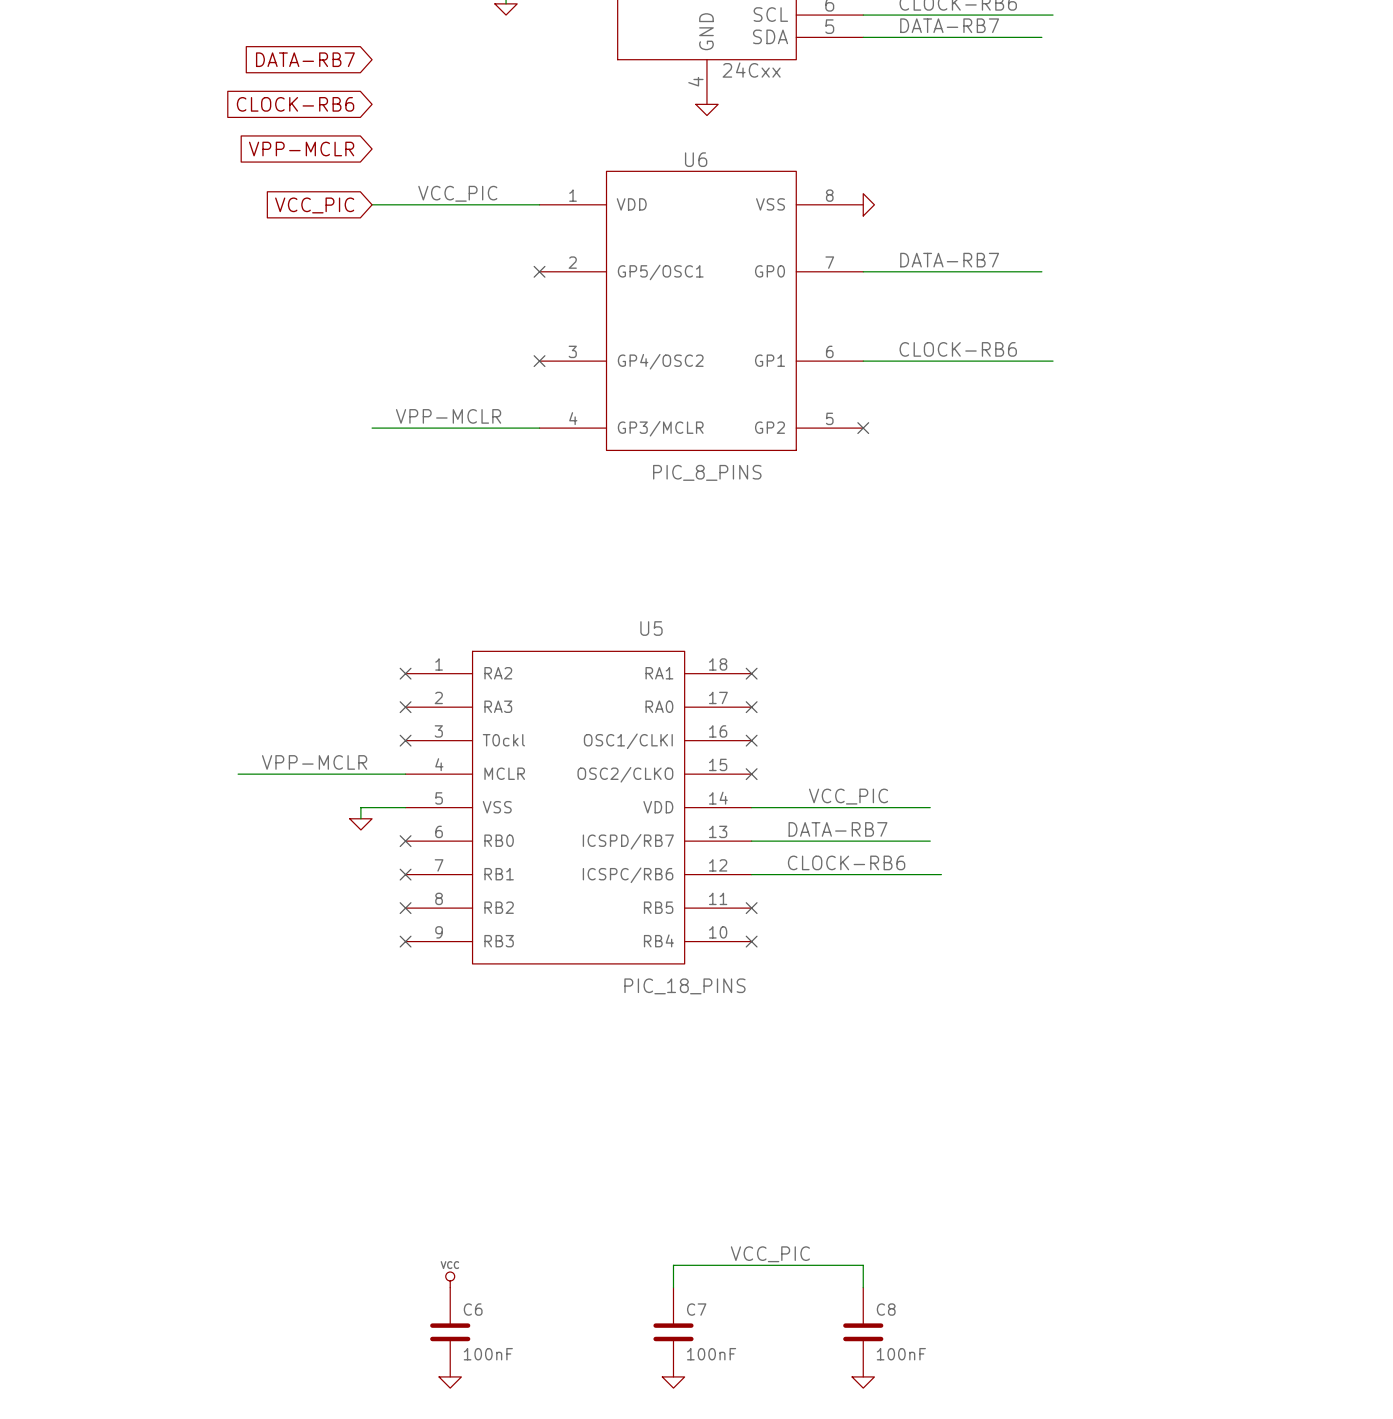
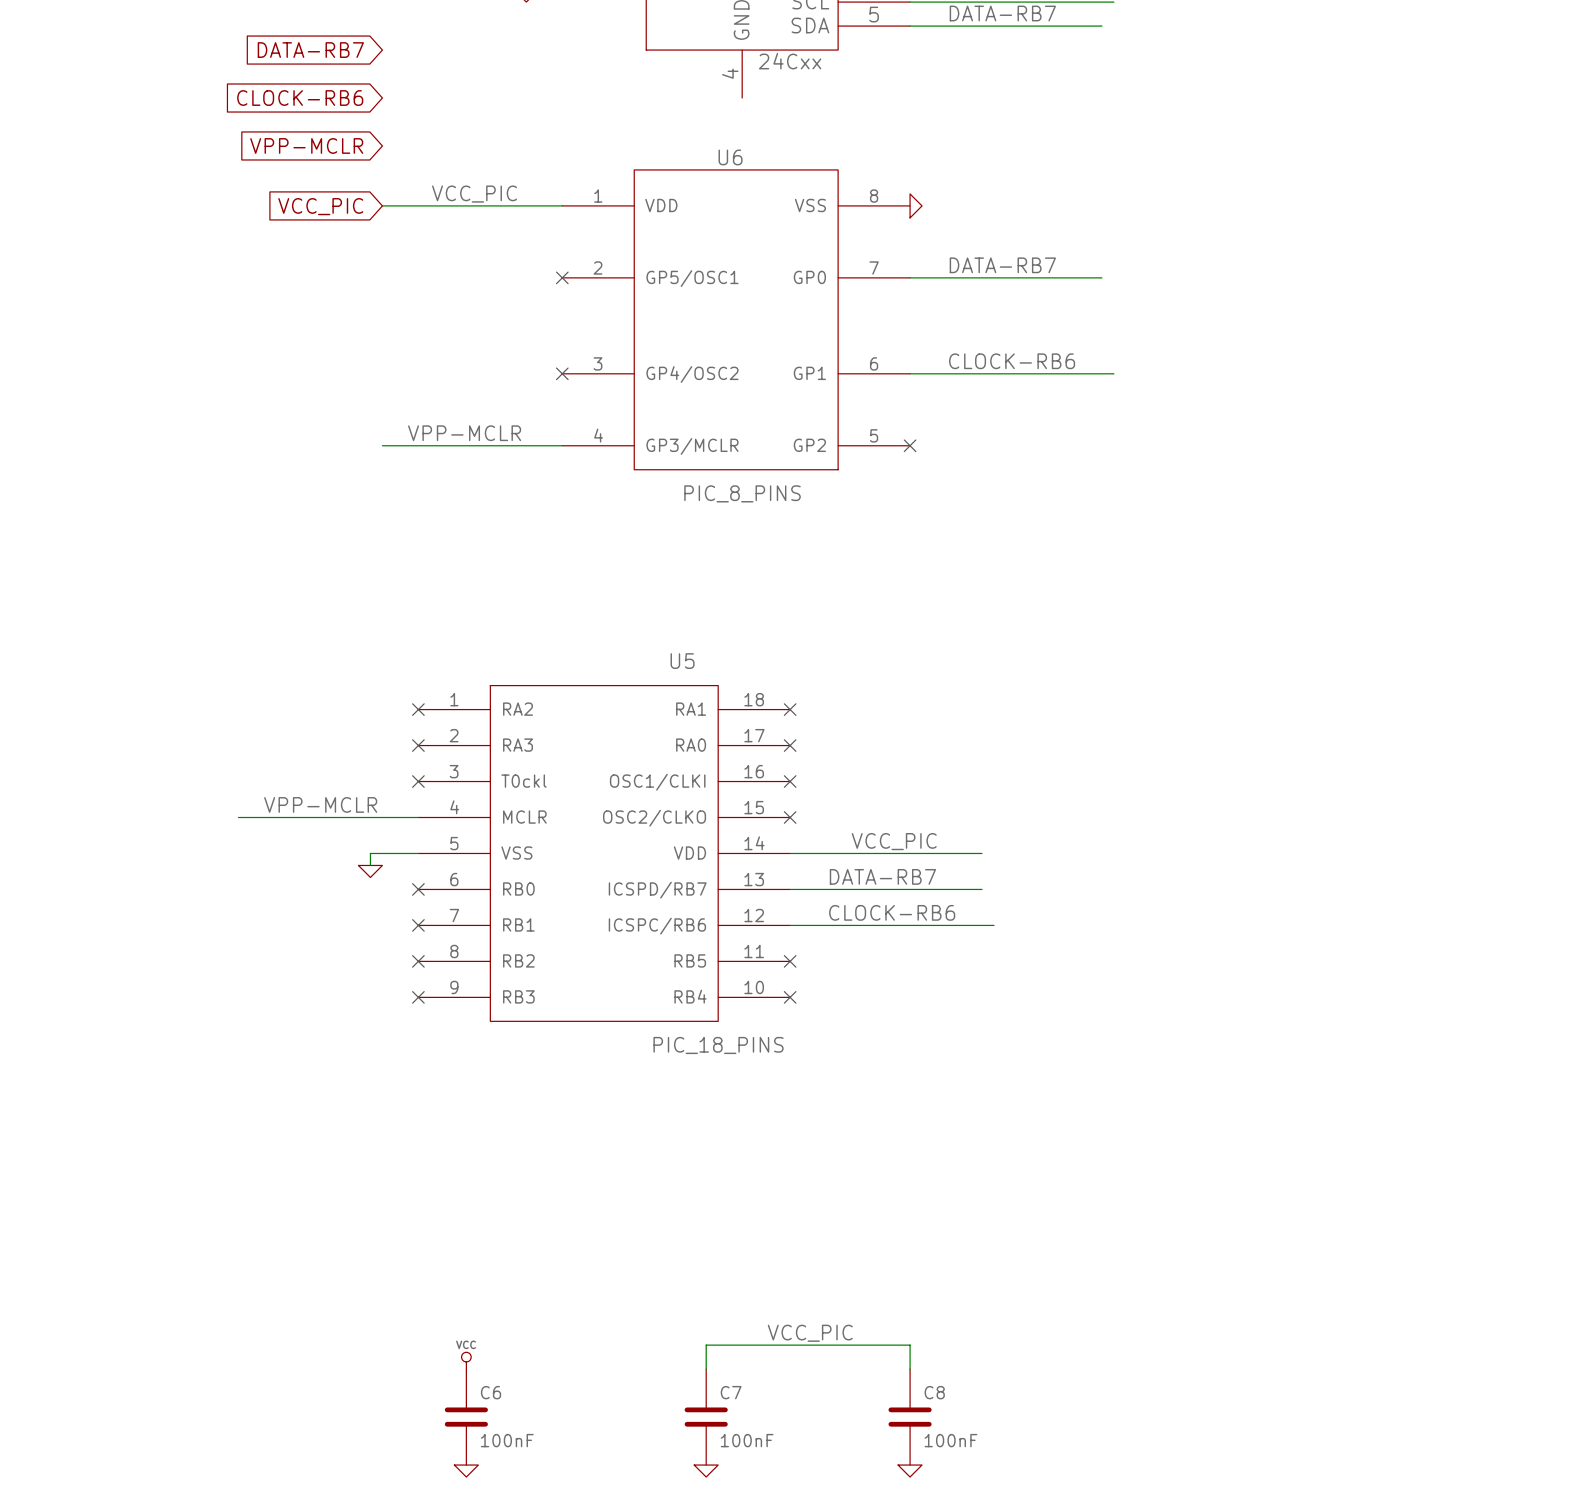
power symbol: (706, 109) -> none

